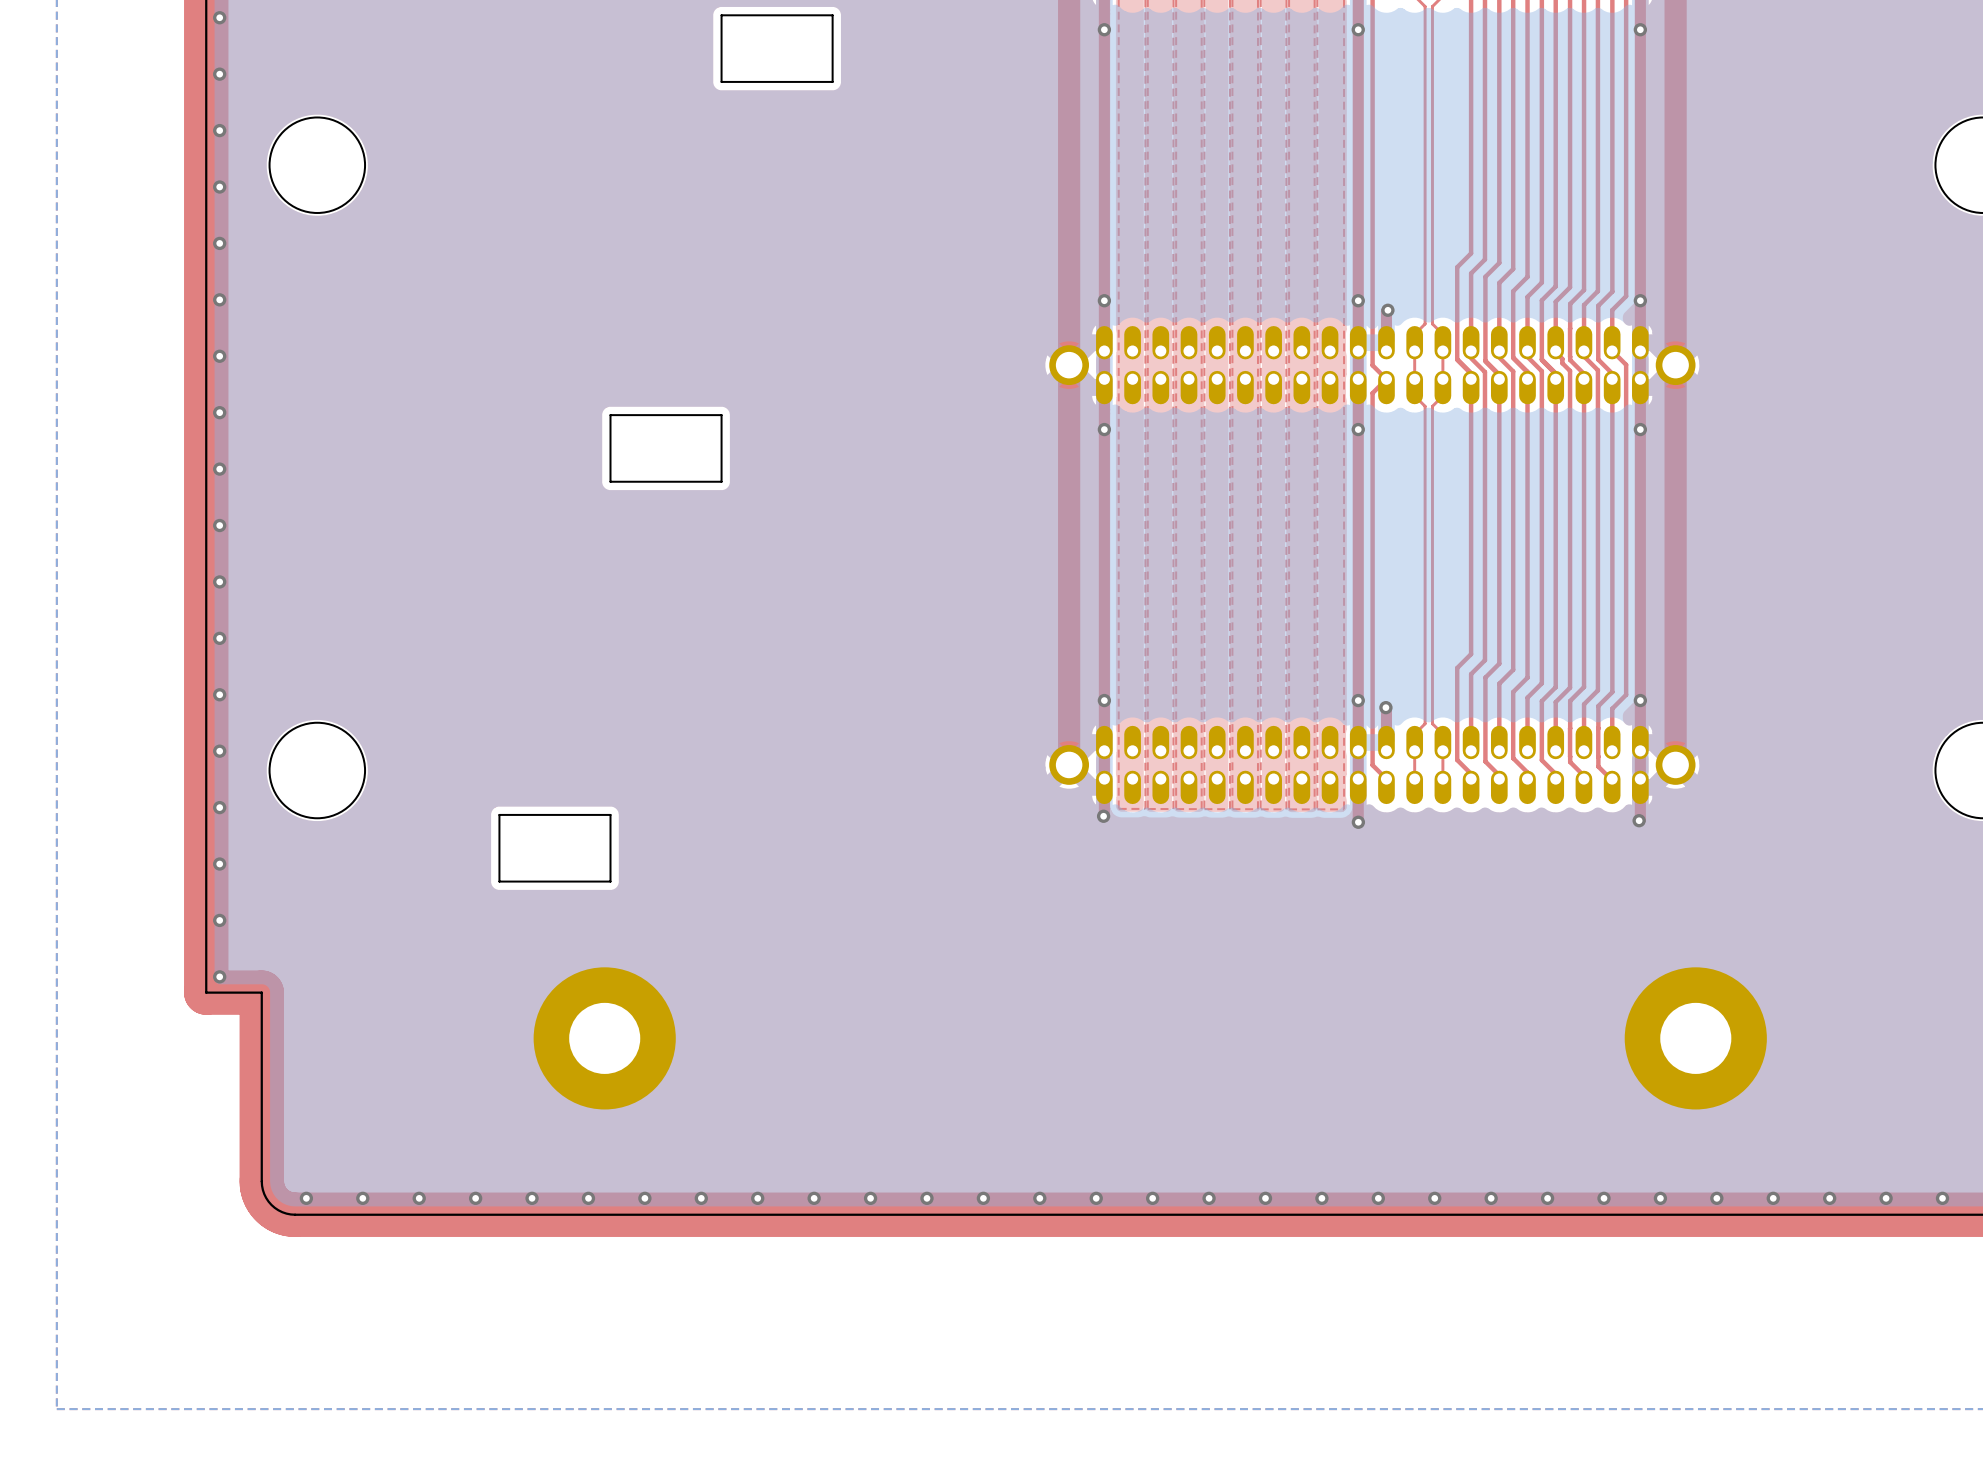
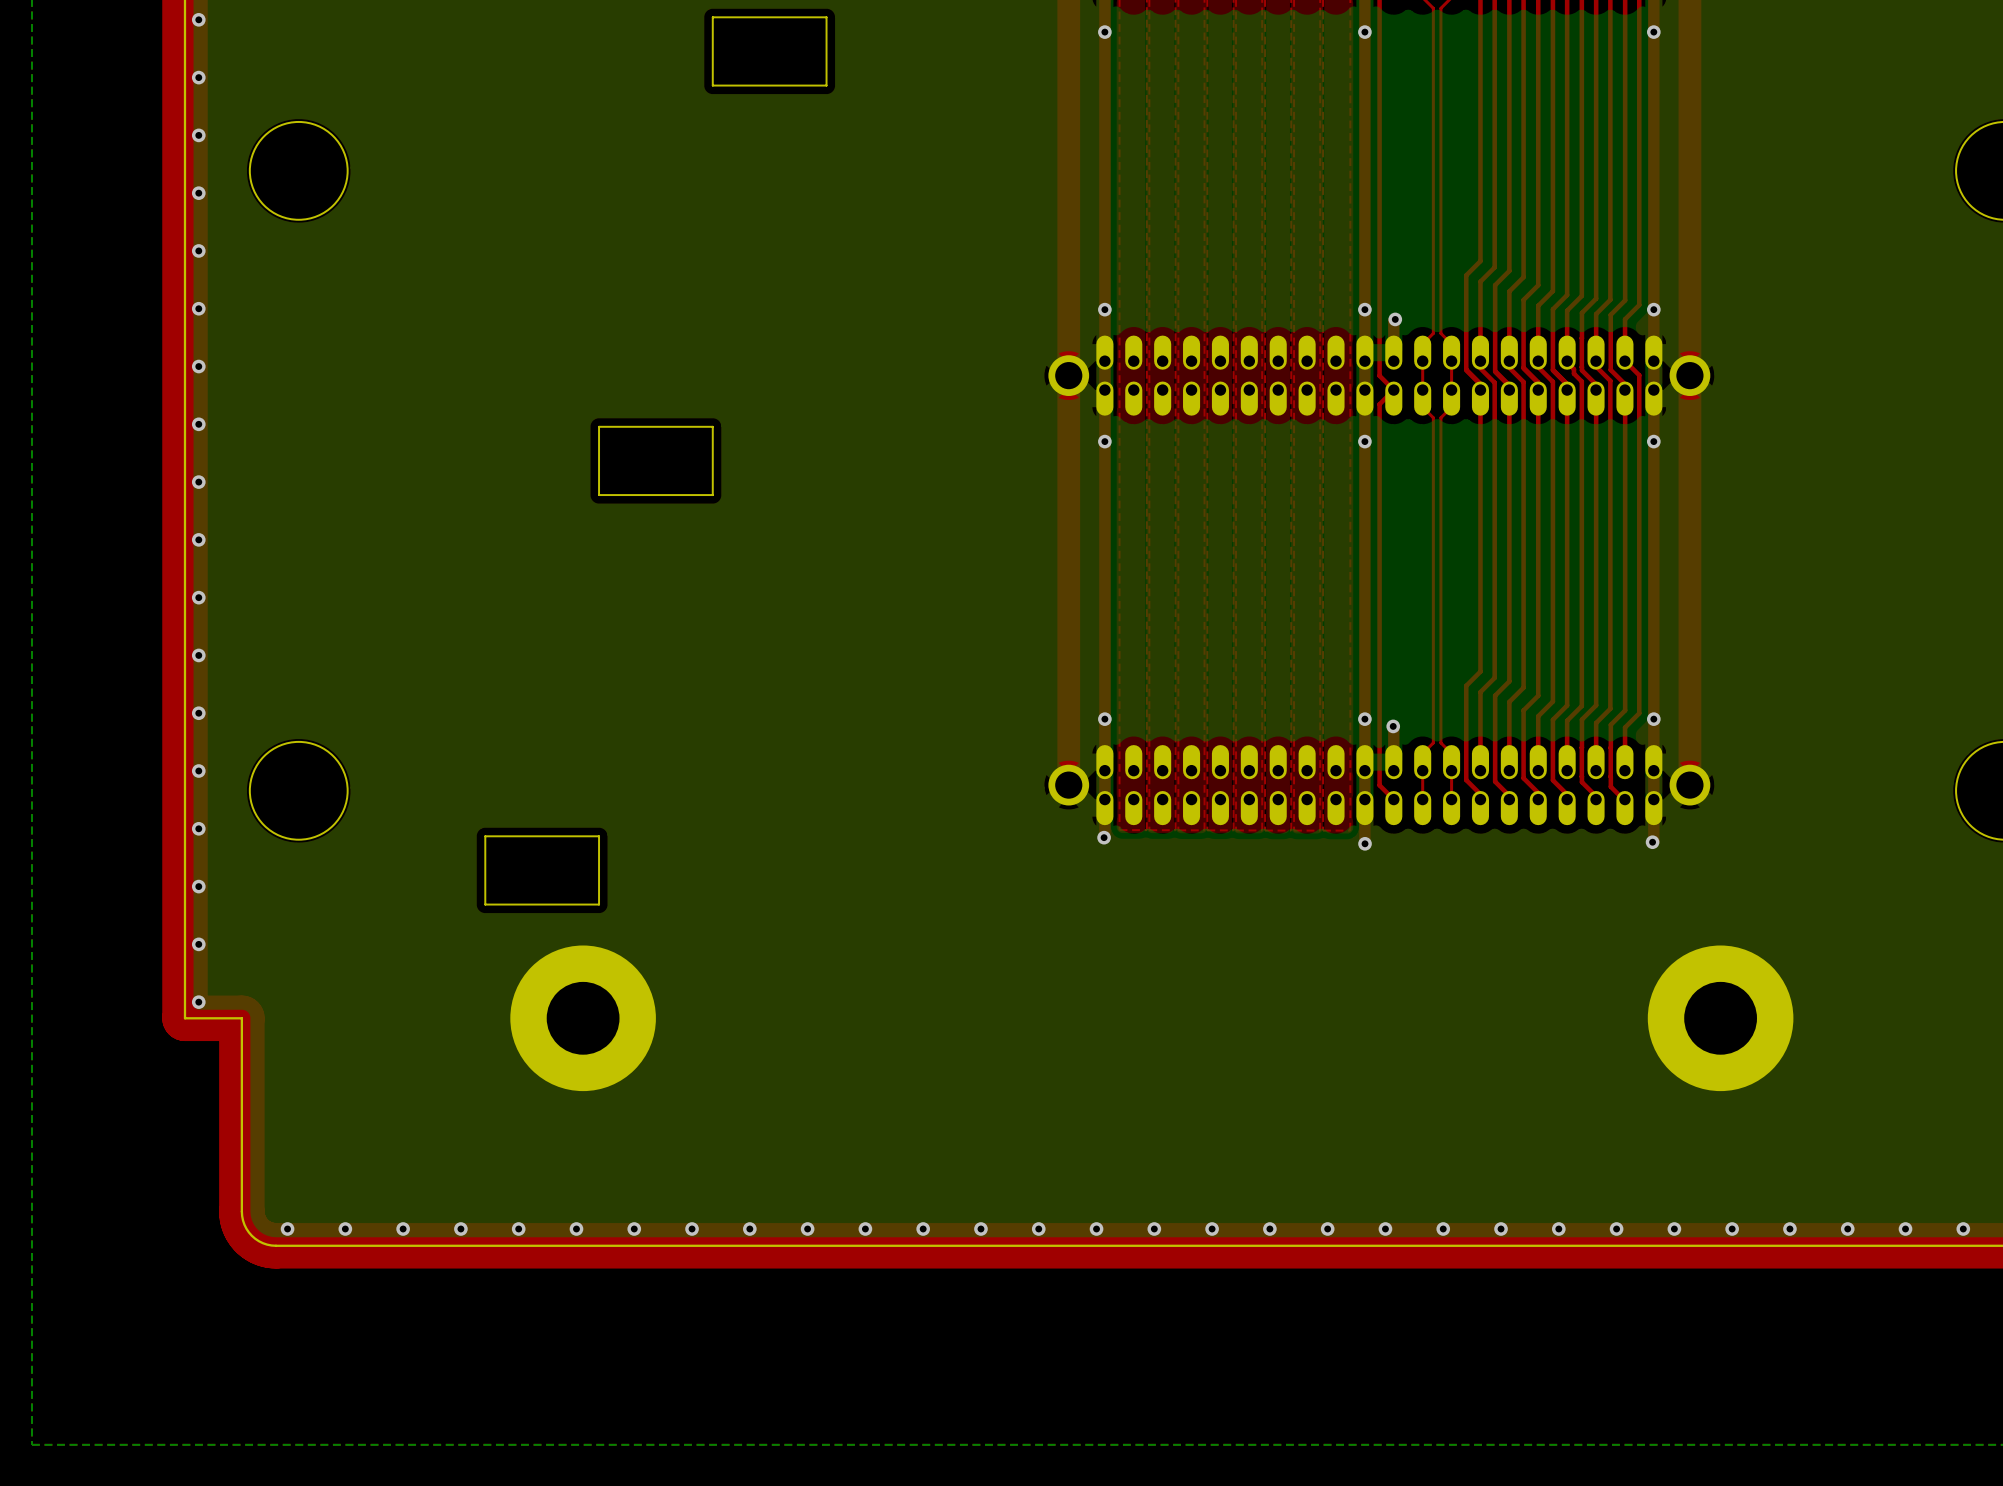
part position: (604, 1038) -> (583, 1018)
part position: (1695, 1038) -> (1720, 1018)

